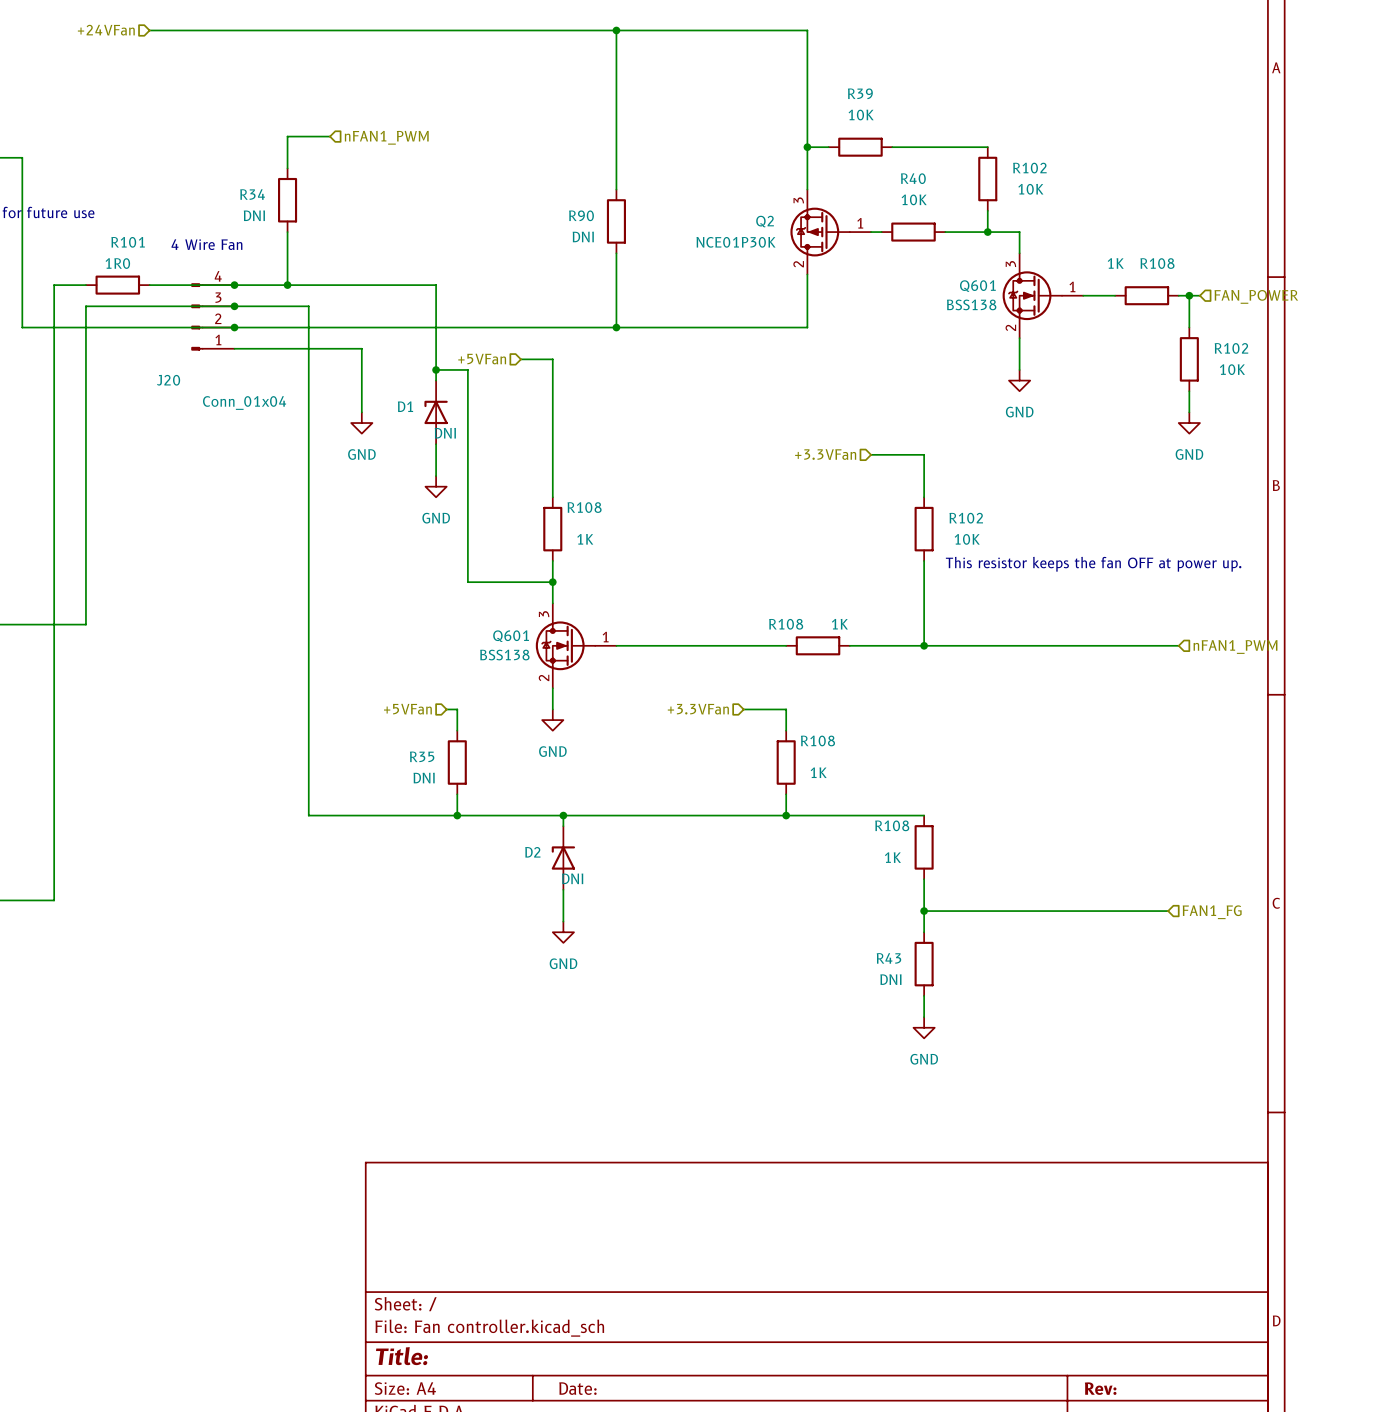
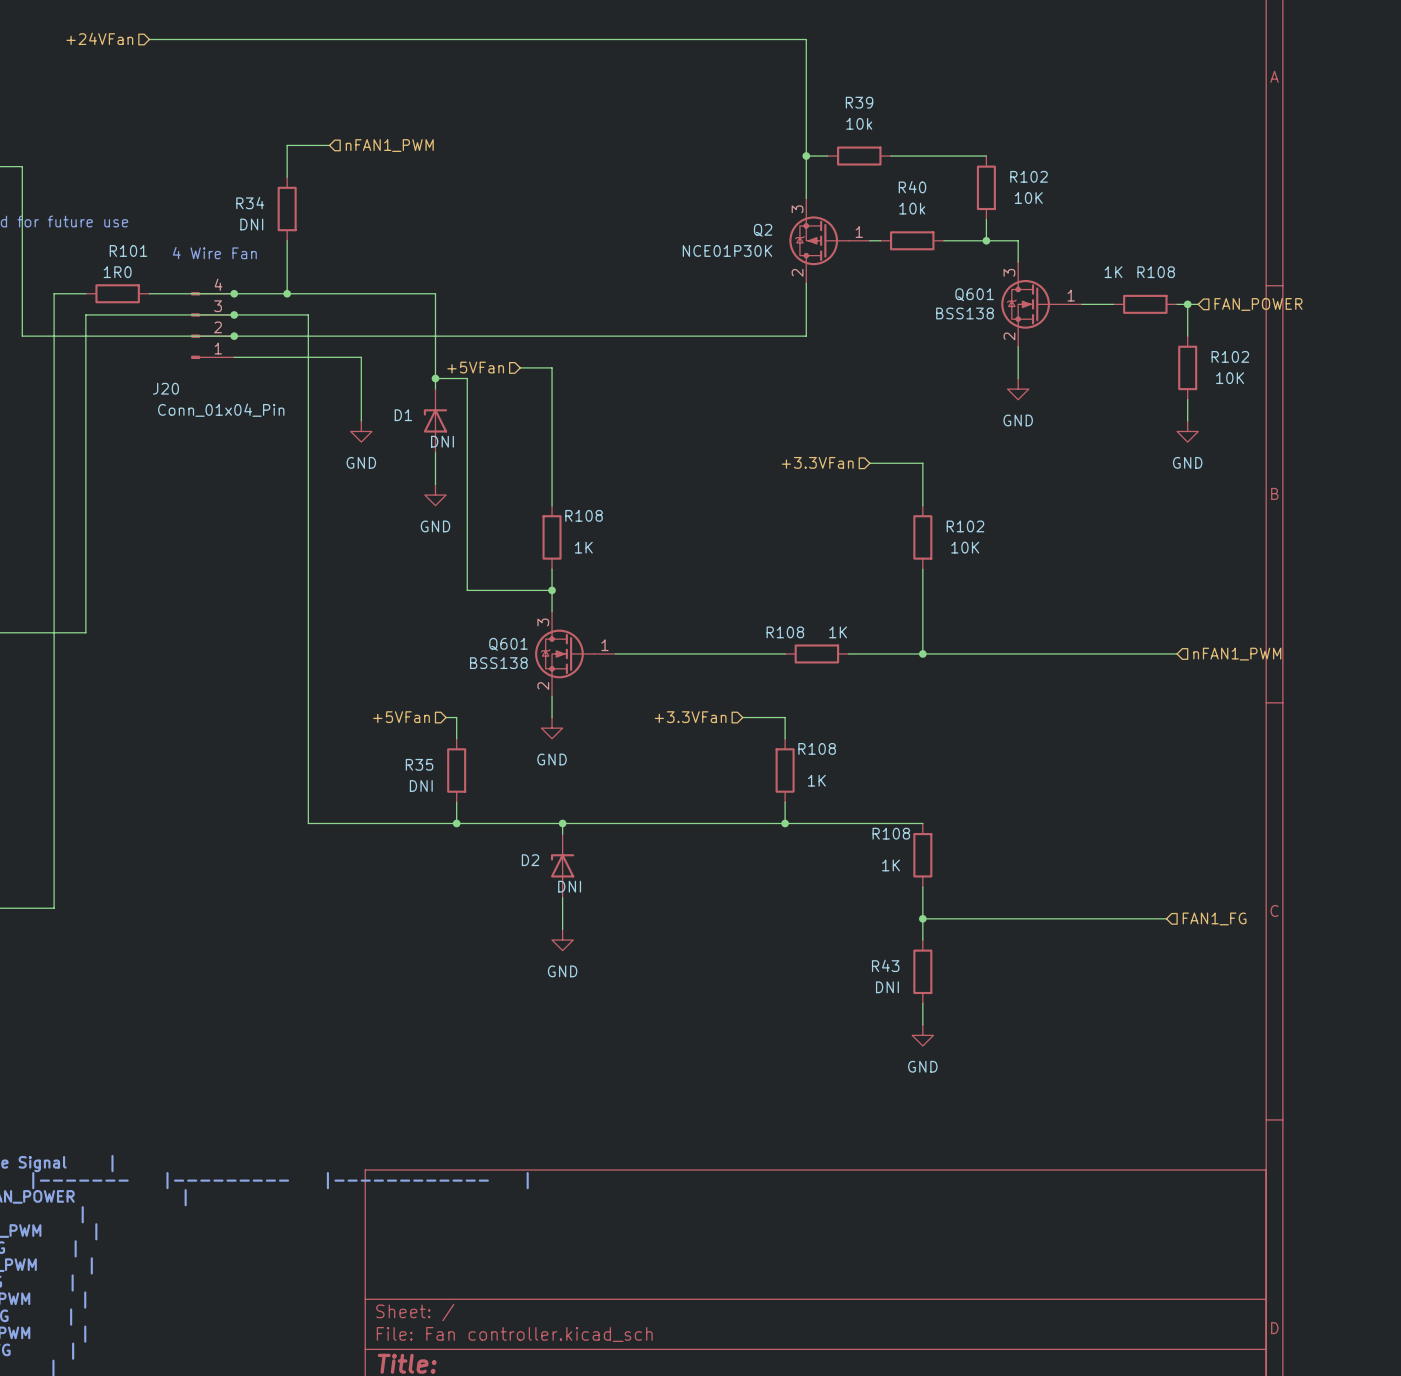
wire: (616, 30) (616, 189) -> none
junction: (616, 30) -> none
R39 value: 10K (861, 115) -> 10k (859, 123)
R40 value: 10K (914, 199) -> 10k (912, 208)
R90: DNI (616, 221) -> none
wire: (616, 253) (616, 327) -> none
junction: (616, 327) -> none
J20 value: Conn_01x04 (244, 402) -> Conn_01x04_Pin (221, 410)
text: This resistor keeps the fan OFF at power up. (1093, 564) -> none

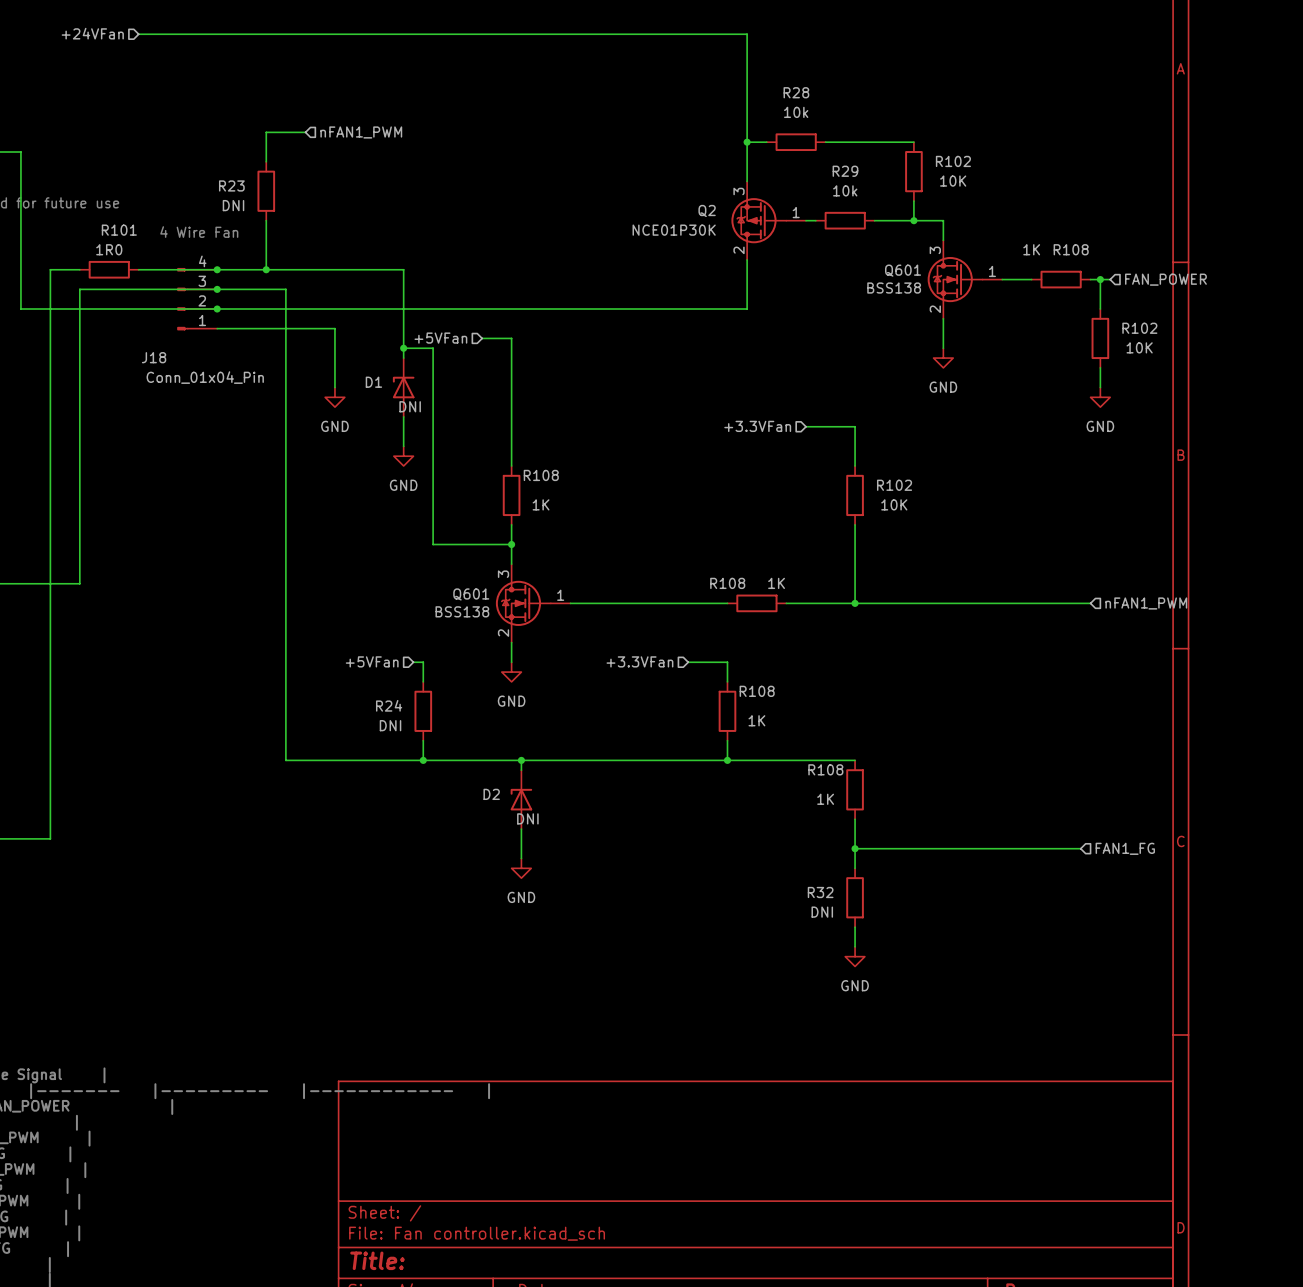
R39 name: R39 (859, 102) -> R28 (796, 92)
R40 name: R40 (912, 187) -> R29 (845, 171)
R34 name: R34 (250, 203) -> R23 (231, 185)
J20 name: J20 (166, 388) -> J18 (154, 357)
R35 name: R35 (419, 764) -> R24 (389, 705)
R43 name: R43 (885, 965) -> R32 (820, 892)

